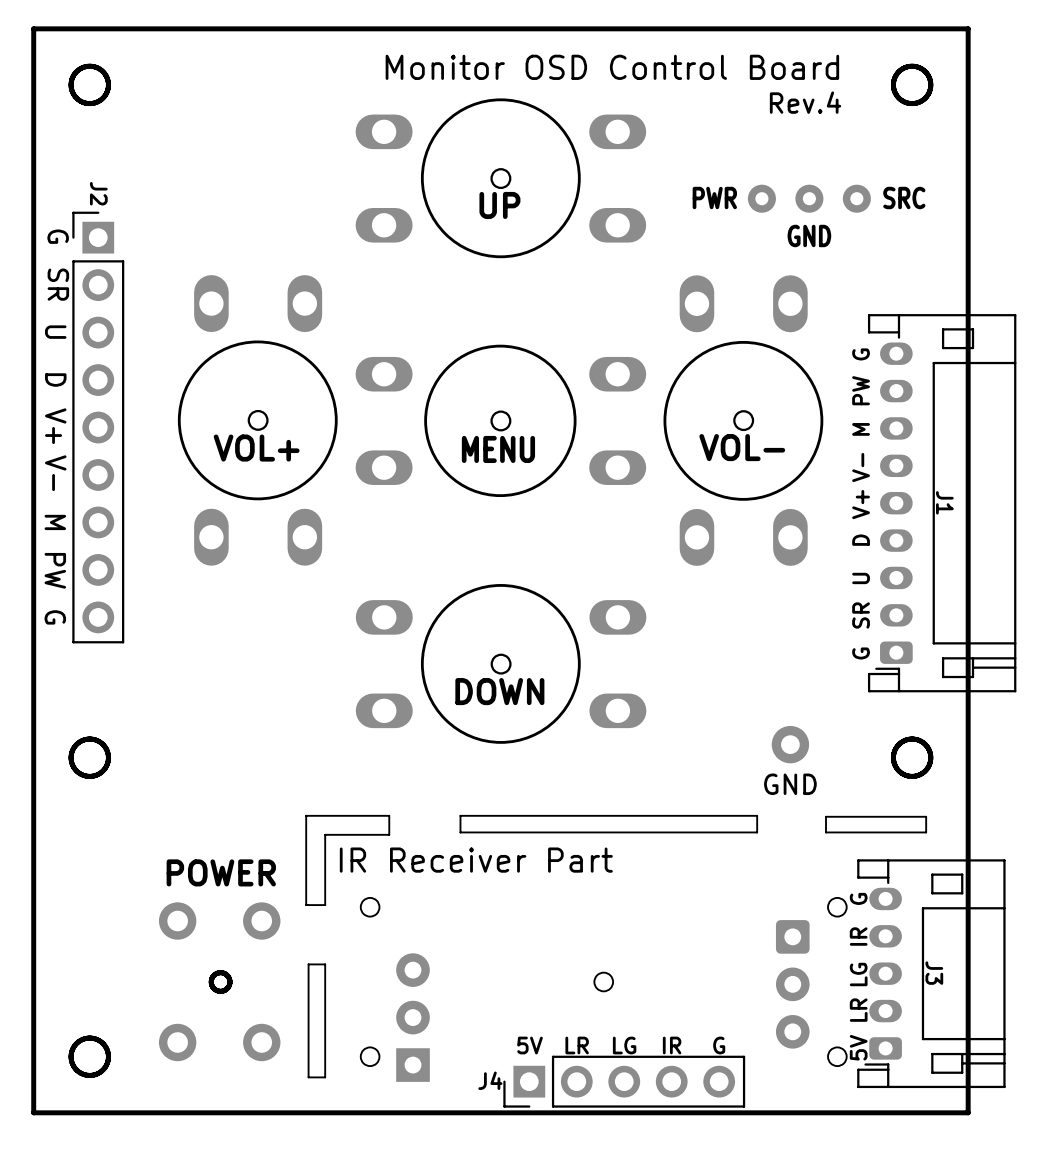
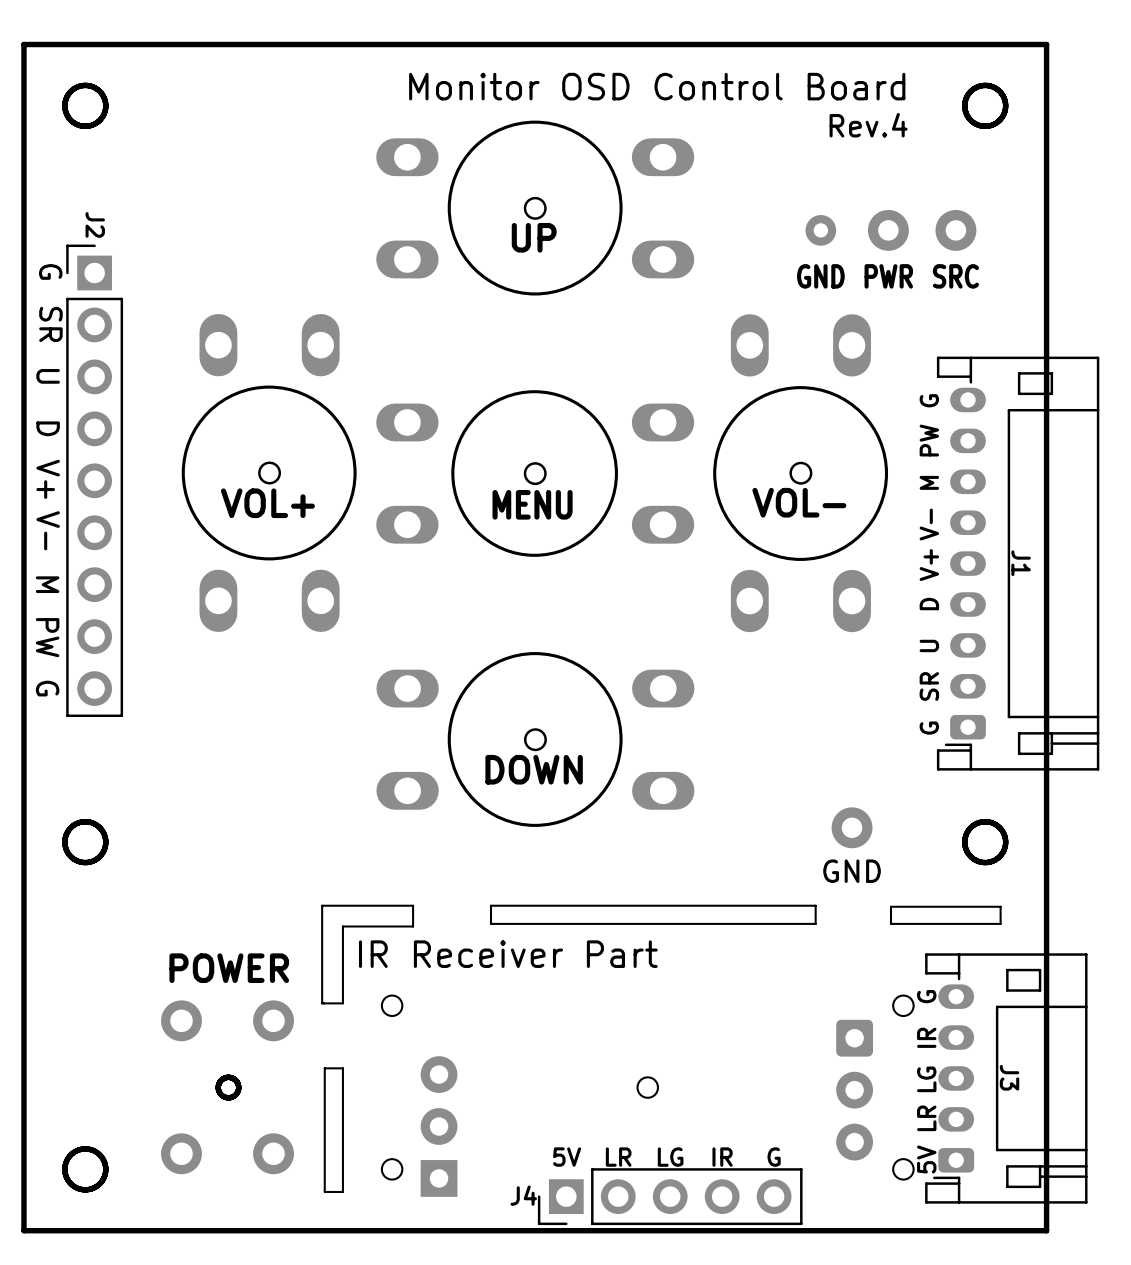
part footprint: [795, 184, 824, 213] -> [867, 209, 909, 251]
text: PWR (714, 198) -> none
part: (856, 198) -> none
part: none -> (955, 230)
text position: SRC (904, 198) -> SRC (955, 276)
text: GND (809, 235) -> PWR (888, 276)
text: none -> GND (820, 276)

